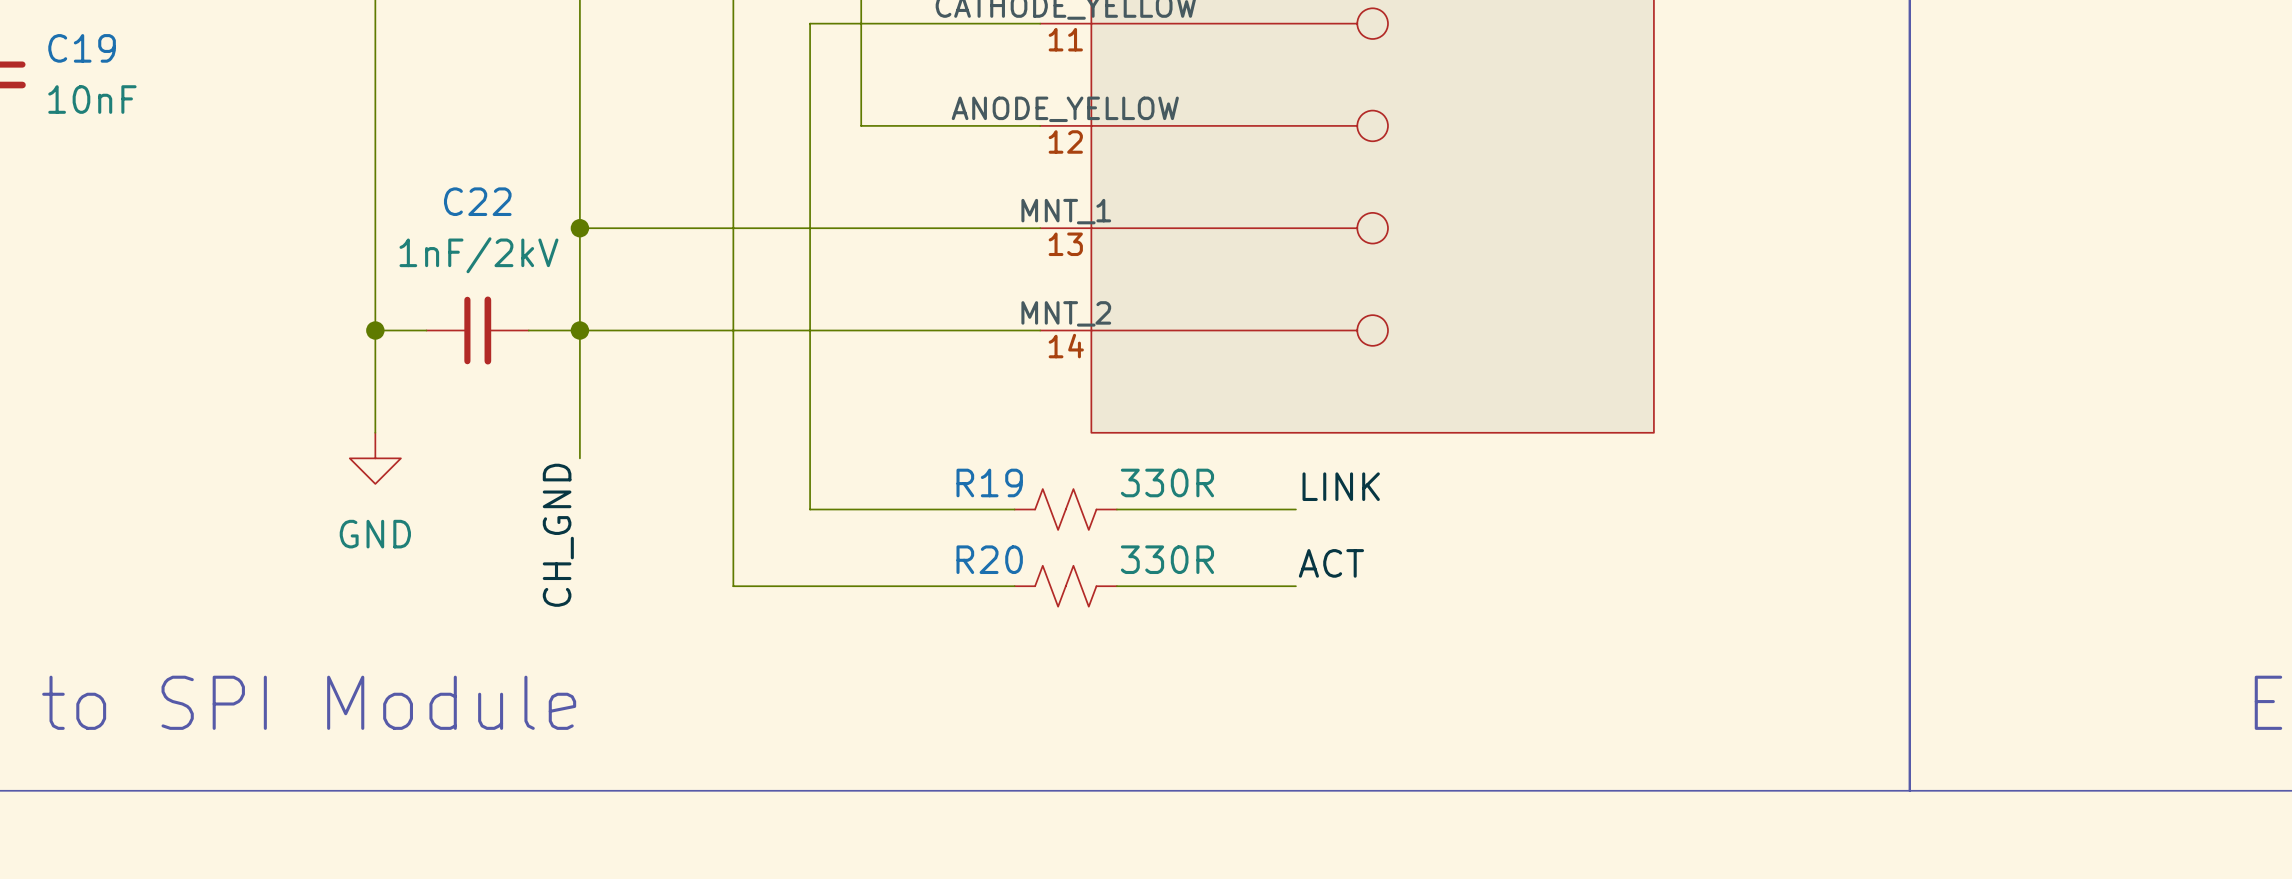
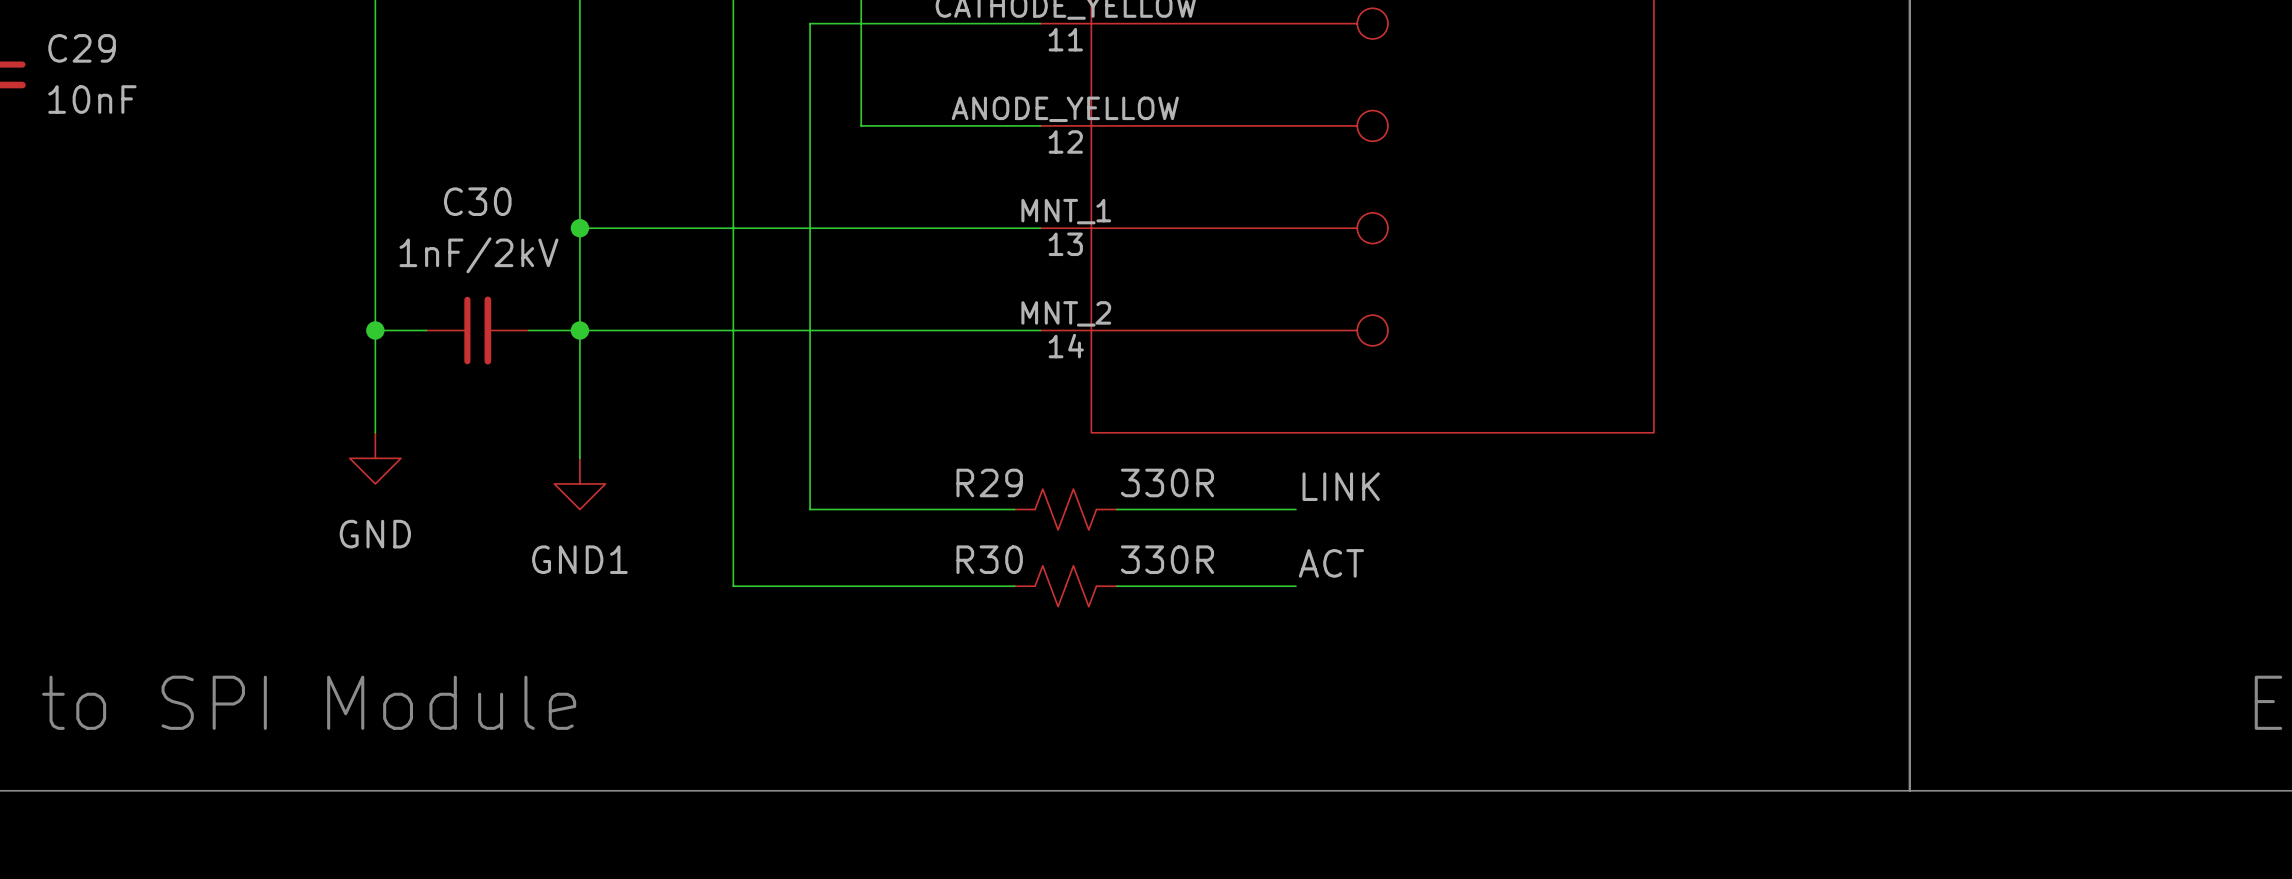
C19 name: C19 (82, 48) -> C29 (82, 48)
C22 name: C22 (477, 201) -> C30 (477, 201)
R19 name: R19 (989, 482) -> R29 (989, 482)
power symbol: none -> GND1 (579, 483)
label: CH_GND (558, 535) -> none
R20 name: R20 (989, 559) -> R30 (989, 559)

